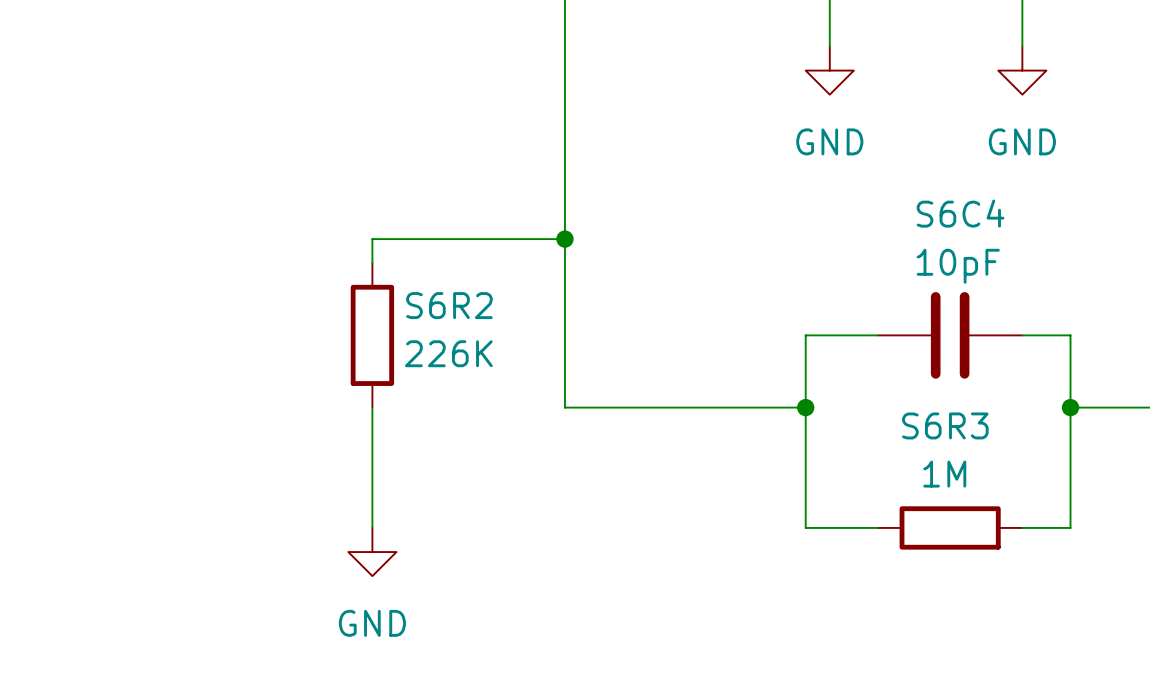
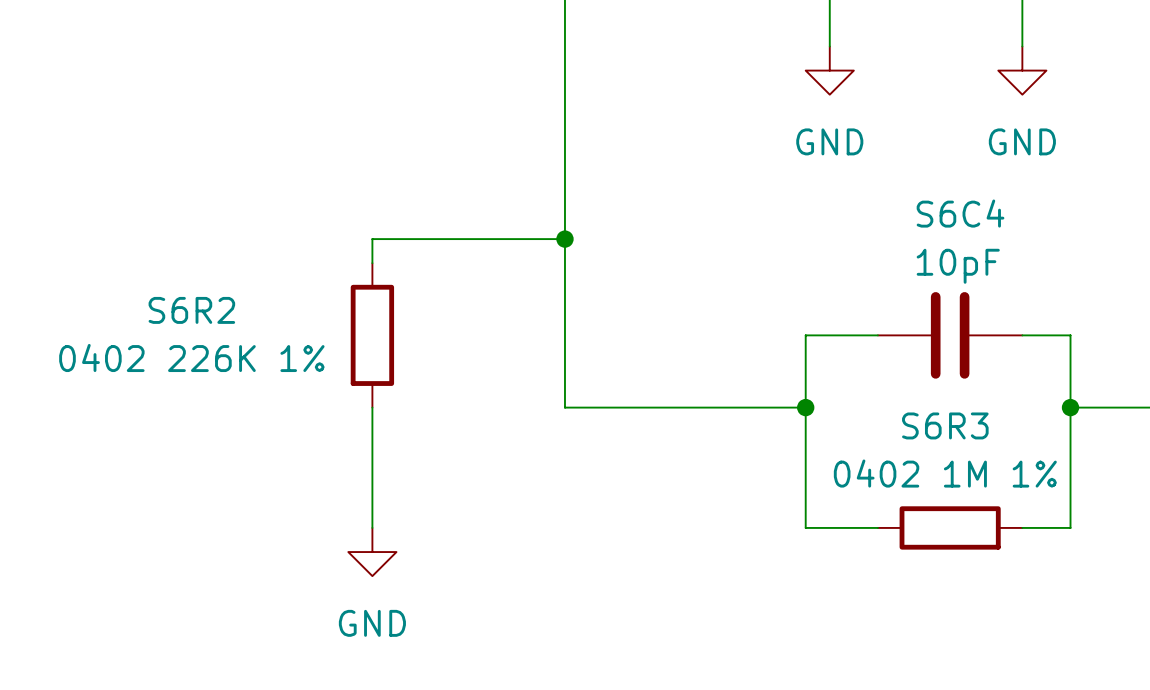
S6R2 name position: S6R2 (449, 305) -> S6R2 (191, 310)
S6R2 value: 226K (448, 353) -> 0402 226K 1% (191, 357)
S6R3 value: 1M (944, 474) -> 0402 1M 1% (945, 473)

